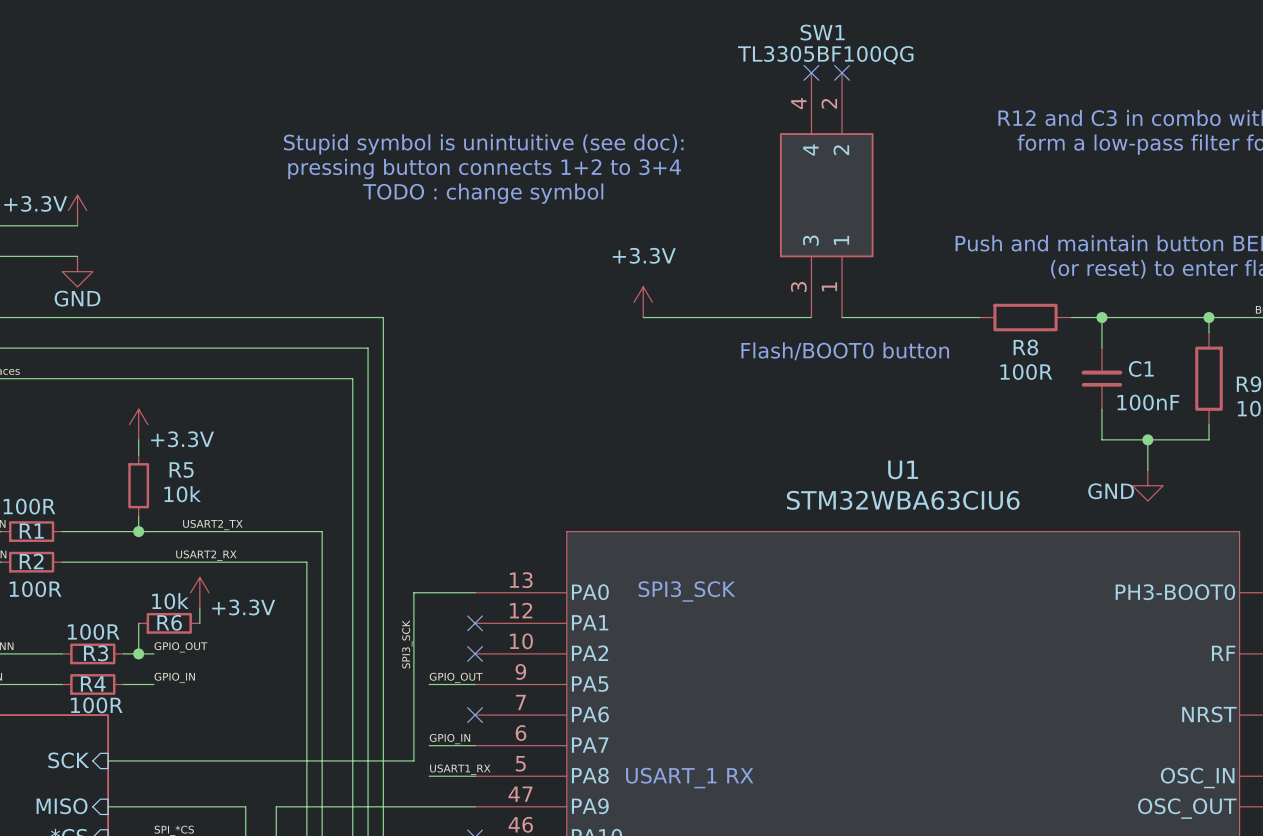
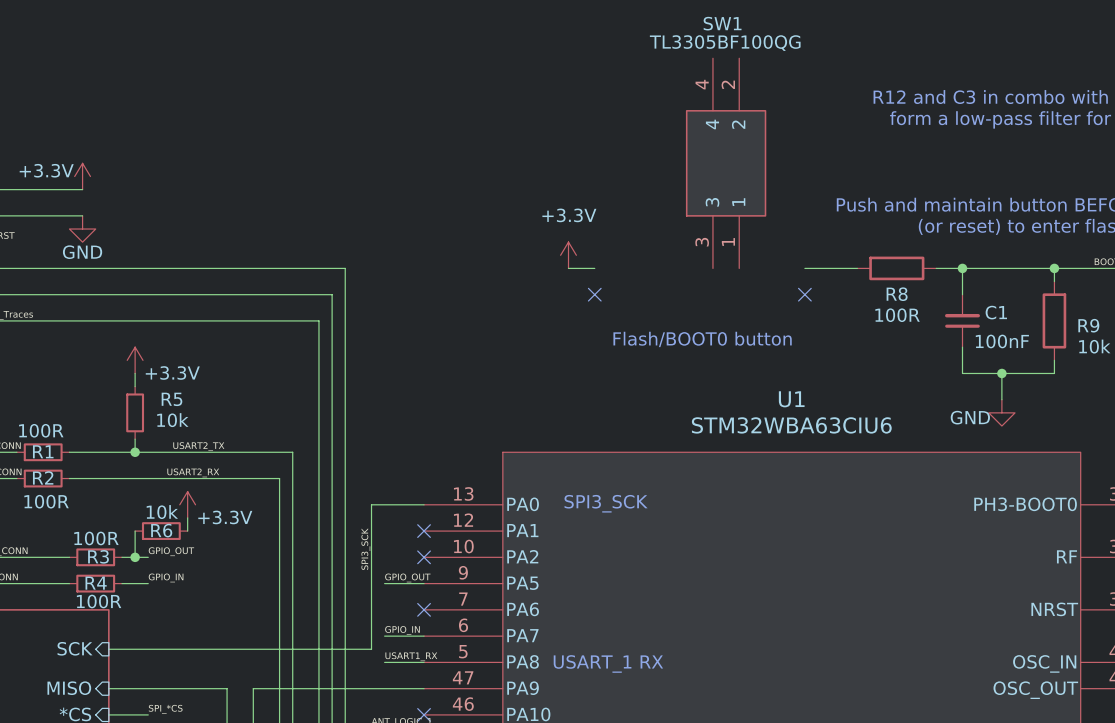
no-connect mark: (811, 72) -> none
no-connect mark: (842, 72) -> none
text: Stupid symbol is unintuitive (see doc): (483, 144) -> none
text: pressing button connects 1+2 to 3+4 (484, 169) -> none
text: TODO : change symbol (483, 193) -> none
wire: (673, 317) (811, 317) -> none
wire: (842, 317) (918, 317) -> none
no-connect mark: none -> (594, 294)
no-connect mark: none -> (804, 294)
text position: Flash/BOOT0 button (845, 351) -> Flash/BOOT0 button (702, 339)

